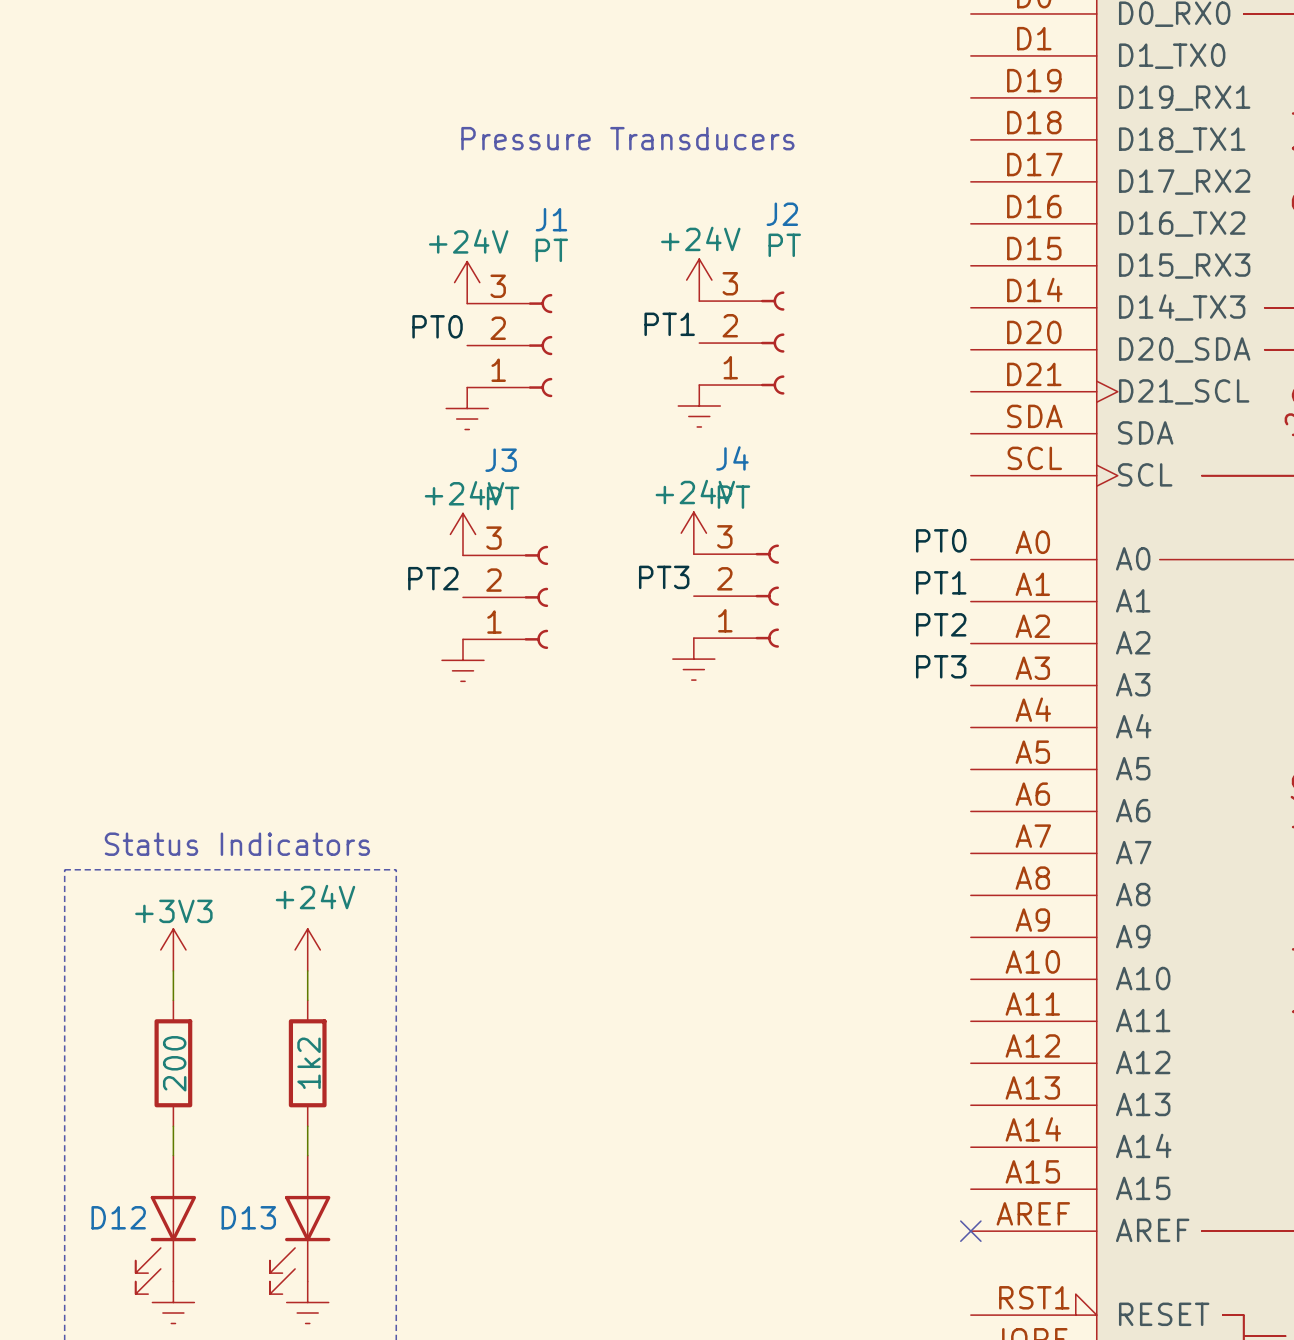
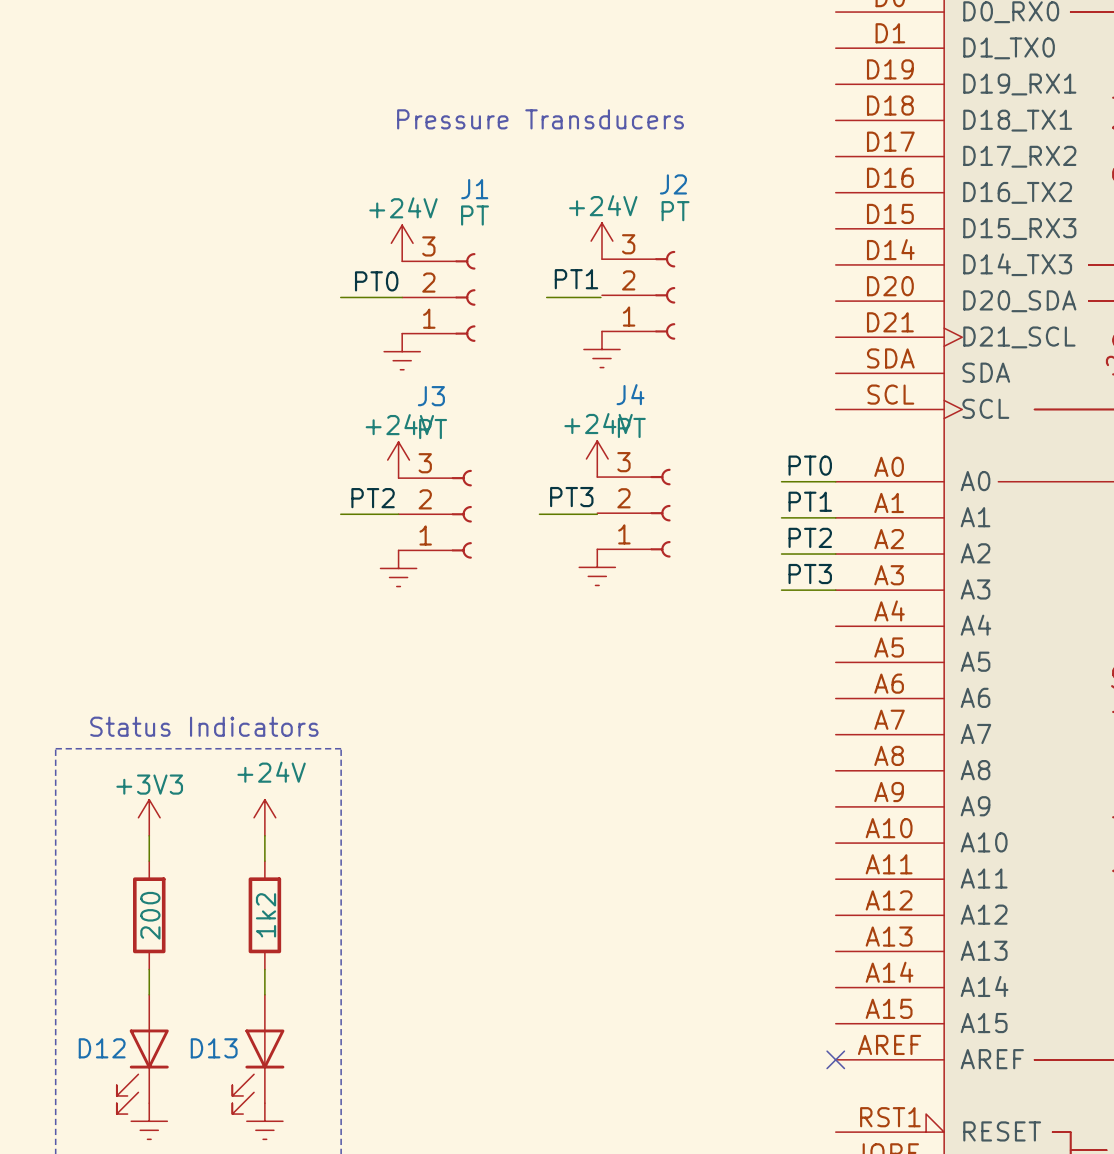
wire: none -> (340, 297) (402, 297)
wire: none -> (546, 297) (600, 297)
wire: none -> (781, 481) (835, 481)
wire: none -> (340, 514) (398, 514)
wire: none -> (539, 514) (597, 514)
wire: none -> (781, 517) (835, 517)
wire: none -> (781, 554) (835, 554)
wire: none -> (781, 590) (835, 590)

